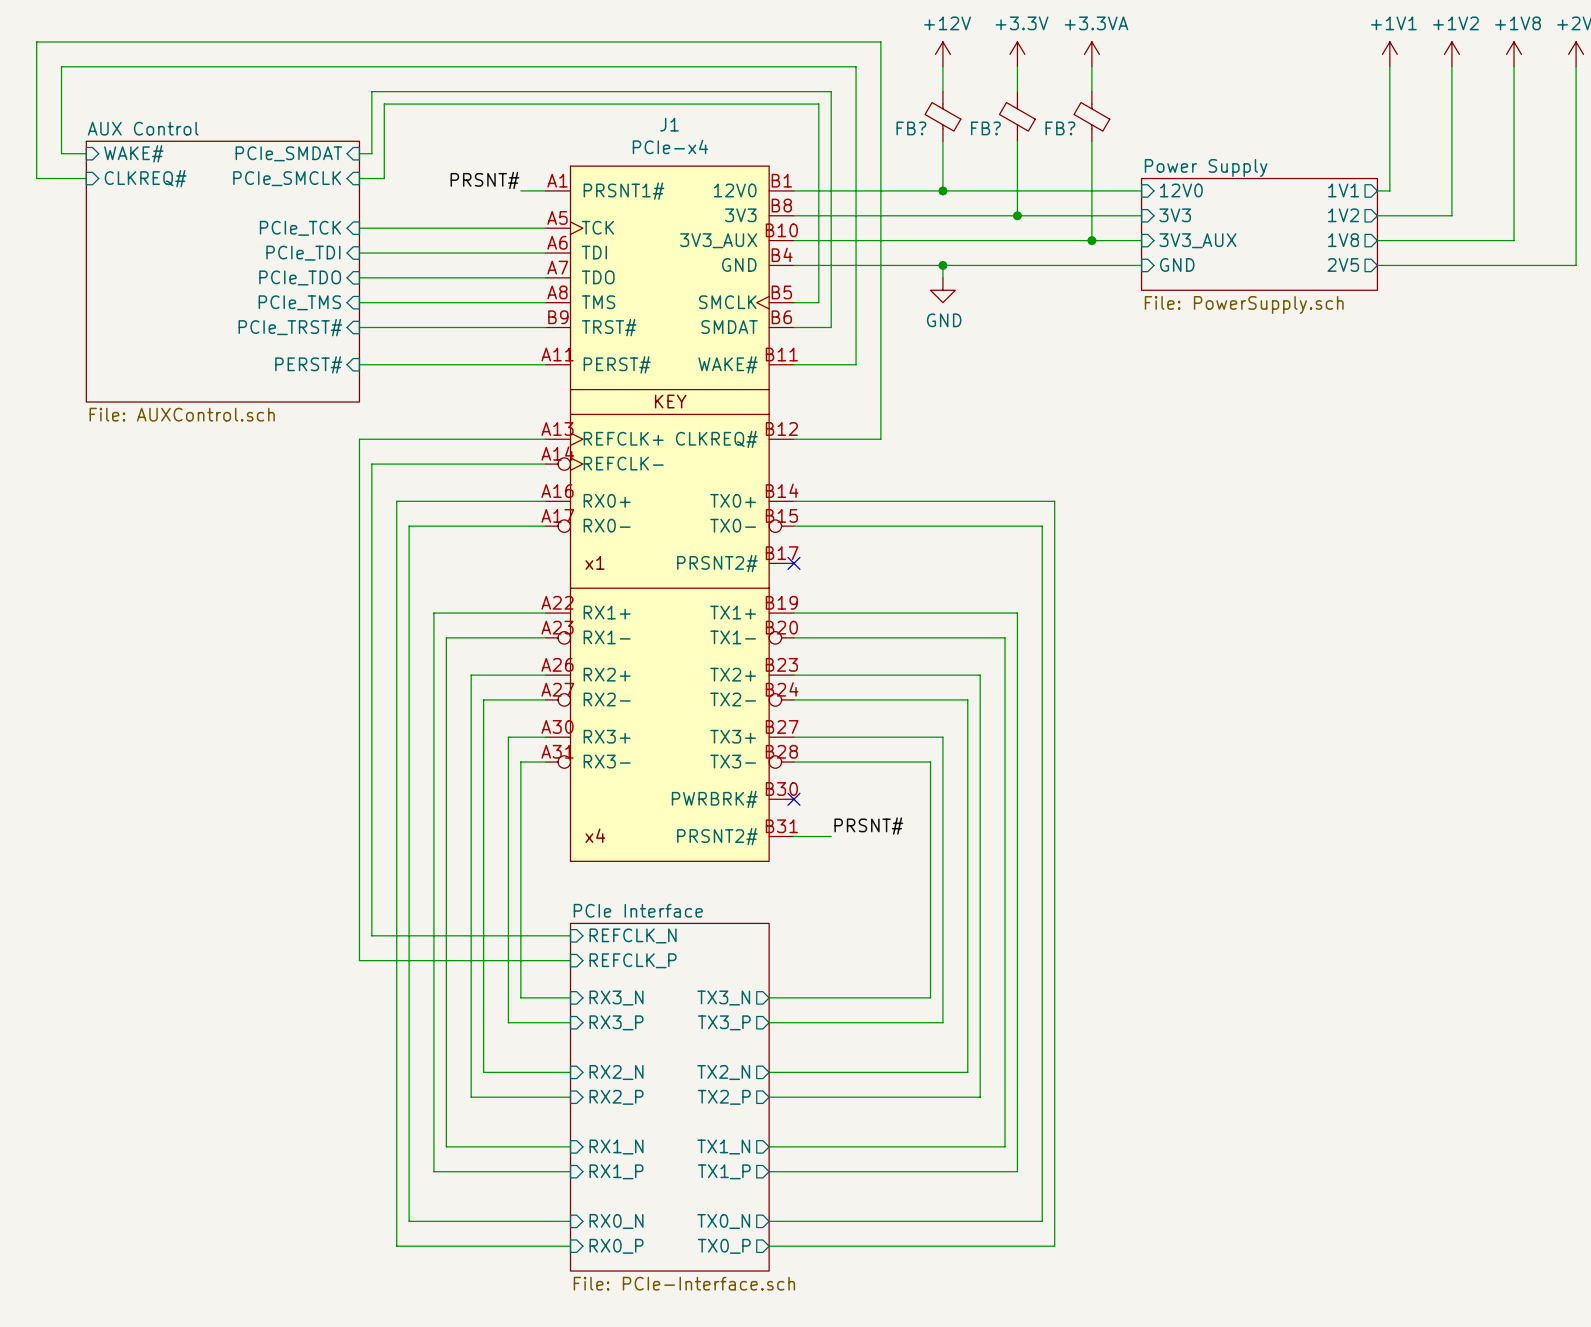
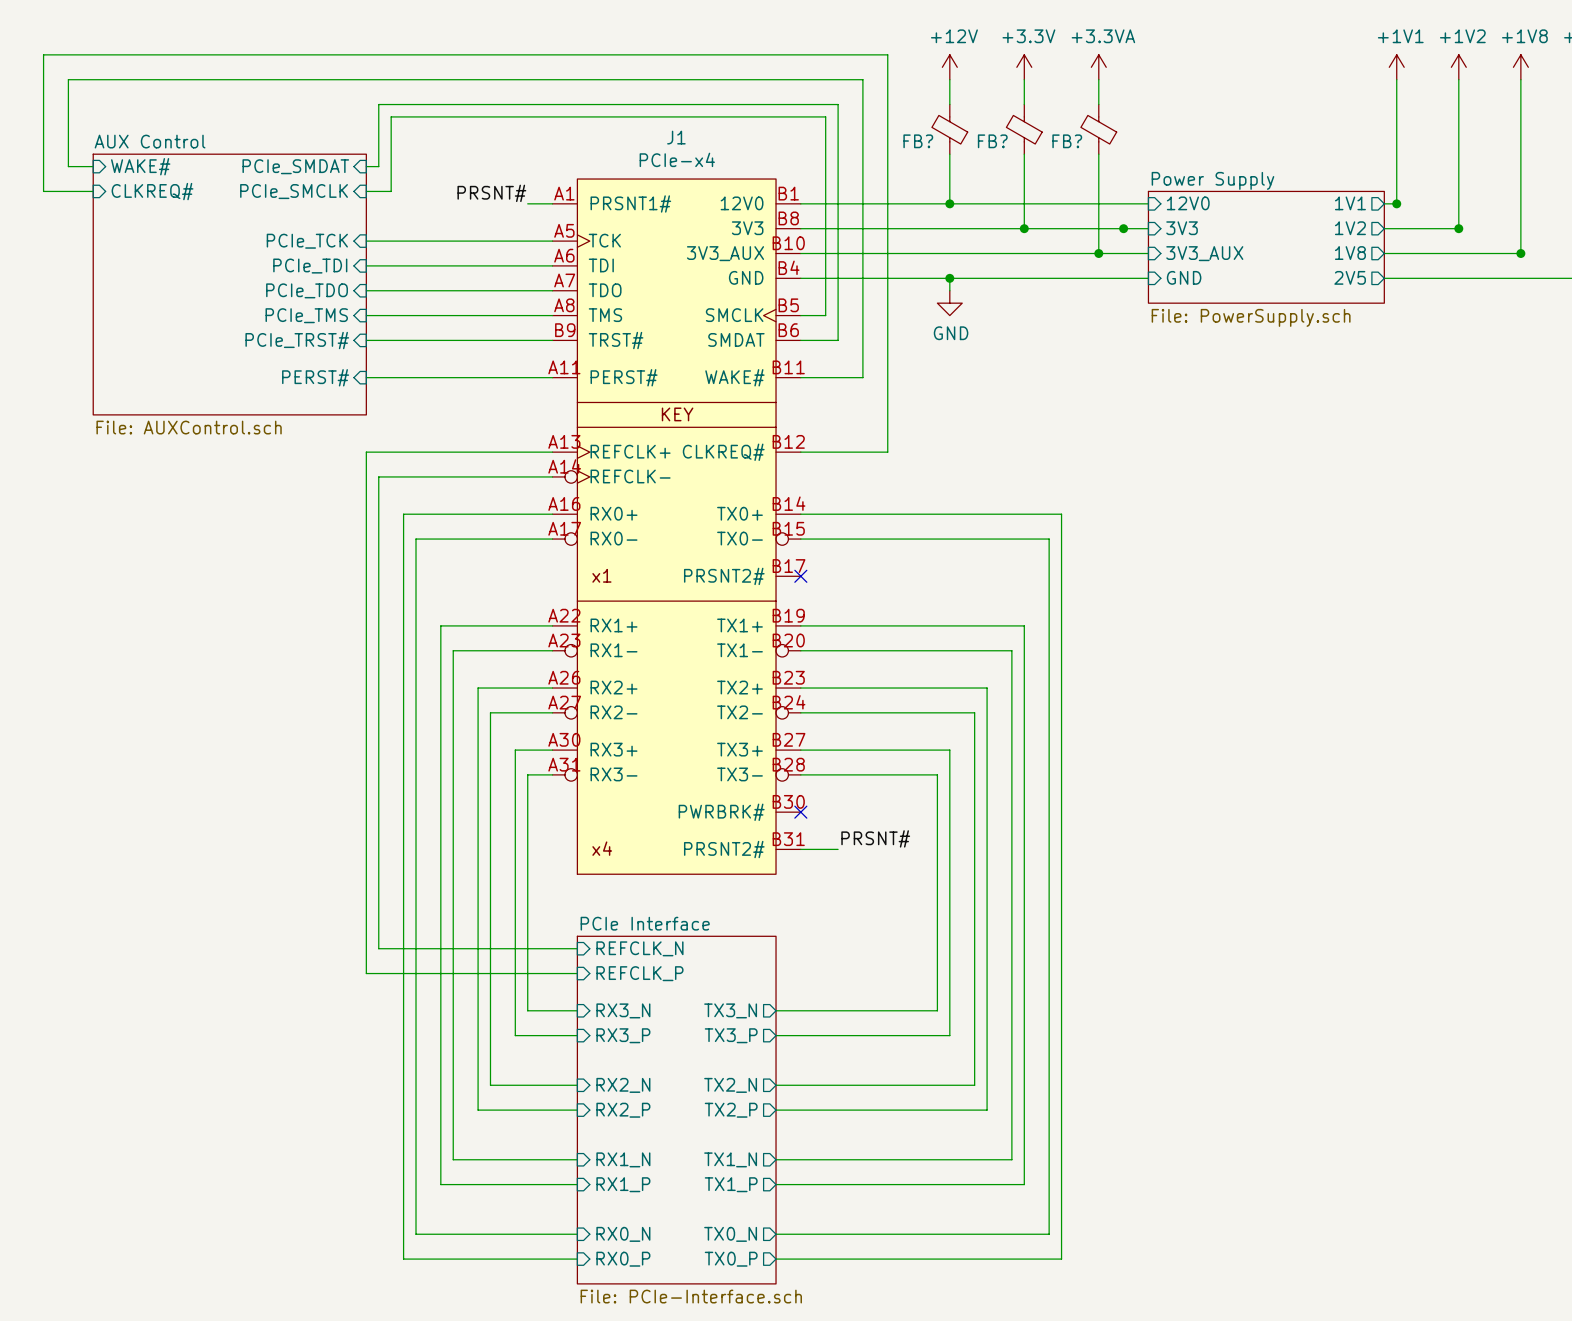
junction: none -> (1396, 203)
junction: none -> (1123, 228)
junction: none -> (1458, 228)
junction: none -> (1520, 253)

